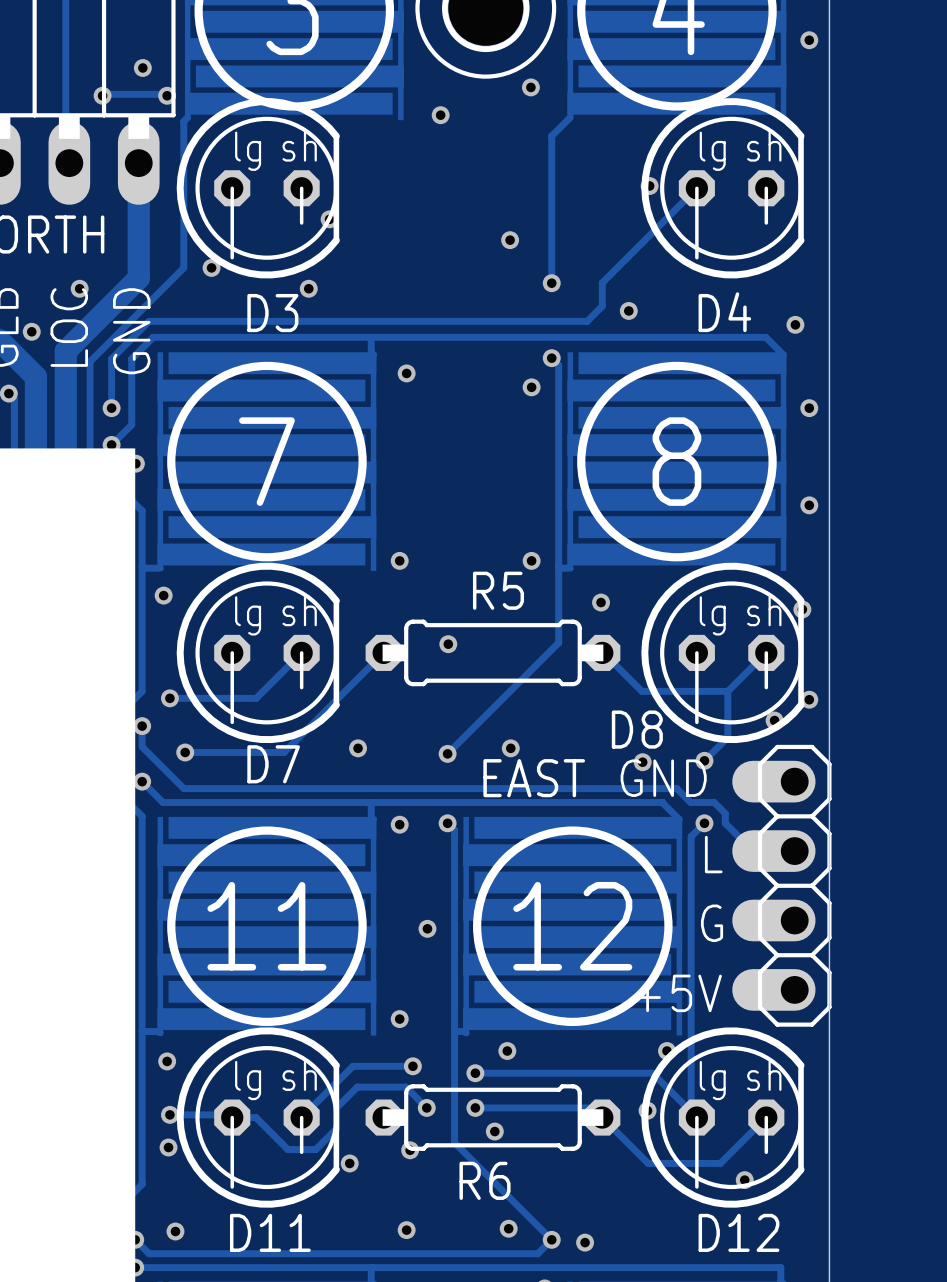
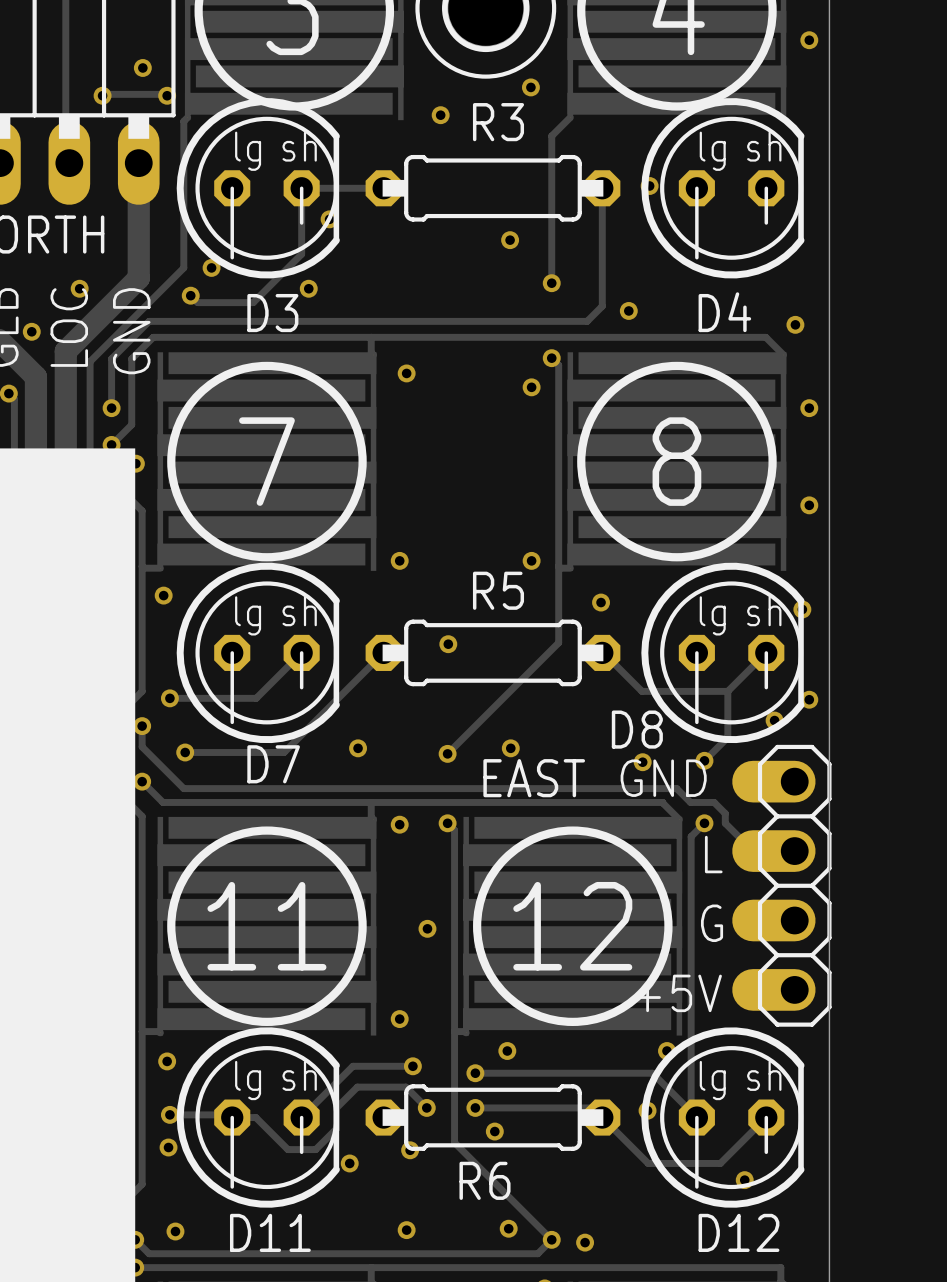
track: none -> (383, 188) (301, 188) (301, 254) (253, 302) (197, 302) (190, 295)
R3: none -> (492, 188)
track: (696, 188) (602, 282) -> (602, 188) (602, 282)
via: none -> (190, 295)

